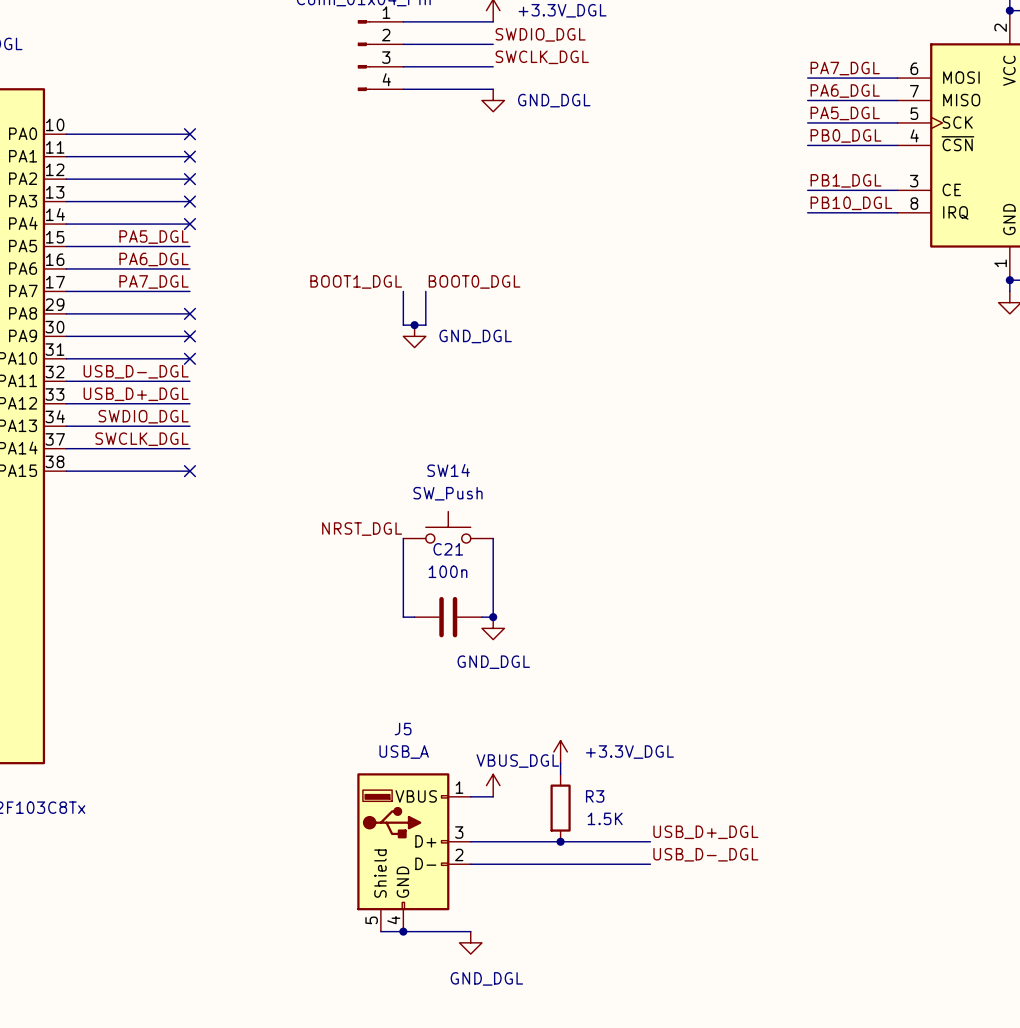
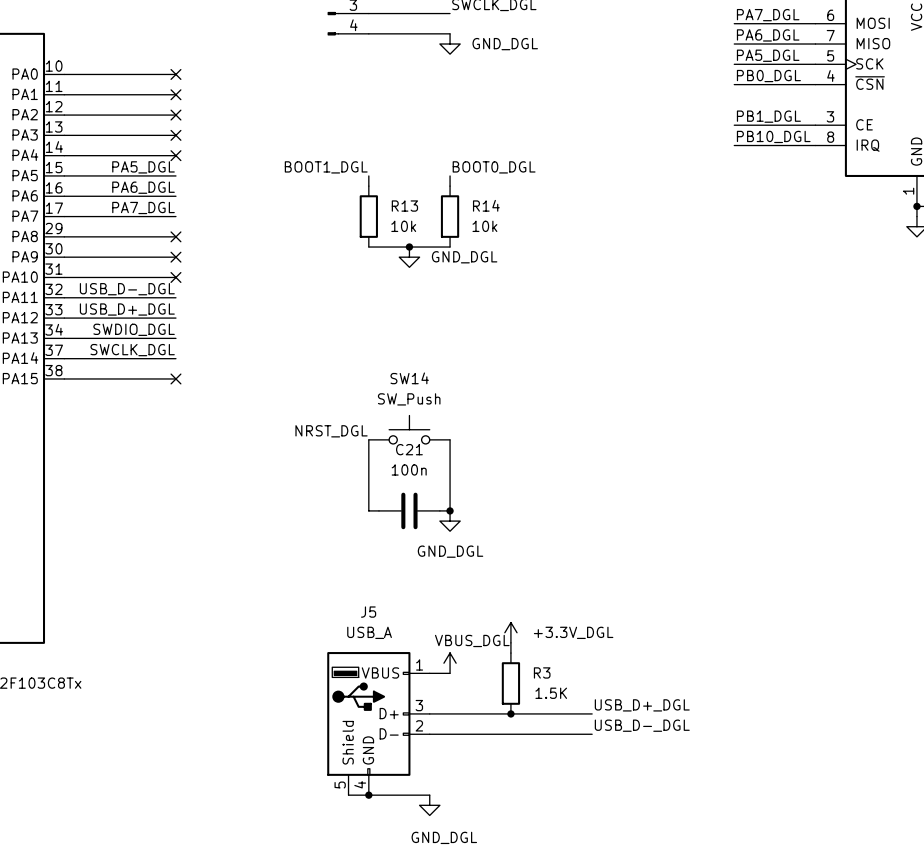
wire: none -> (368, 175) (368, 186)
wire: none -> (450, 175) (450, 186)
label position: BOOT1_DGL (356, 281) -> BOOT1_DGL (326, 167)
label position: BOOT0_DGL (474, 281) -> BOOT0_DGL (494, 167)
wire: (403, 291) (403, 325) -> none
R13: none -> 10k (368, 216)
wire: (425, 291) (425, 325) -> (450, 247) (389, 247)
R14: none -> 10k (450, 216)
junction position: (414, 325) -> (409, 247)
power symbol position: GND_DGL (414, 336) -> GND_DGL (409, 257)

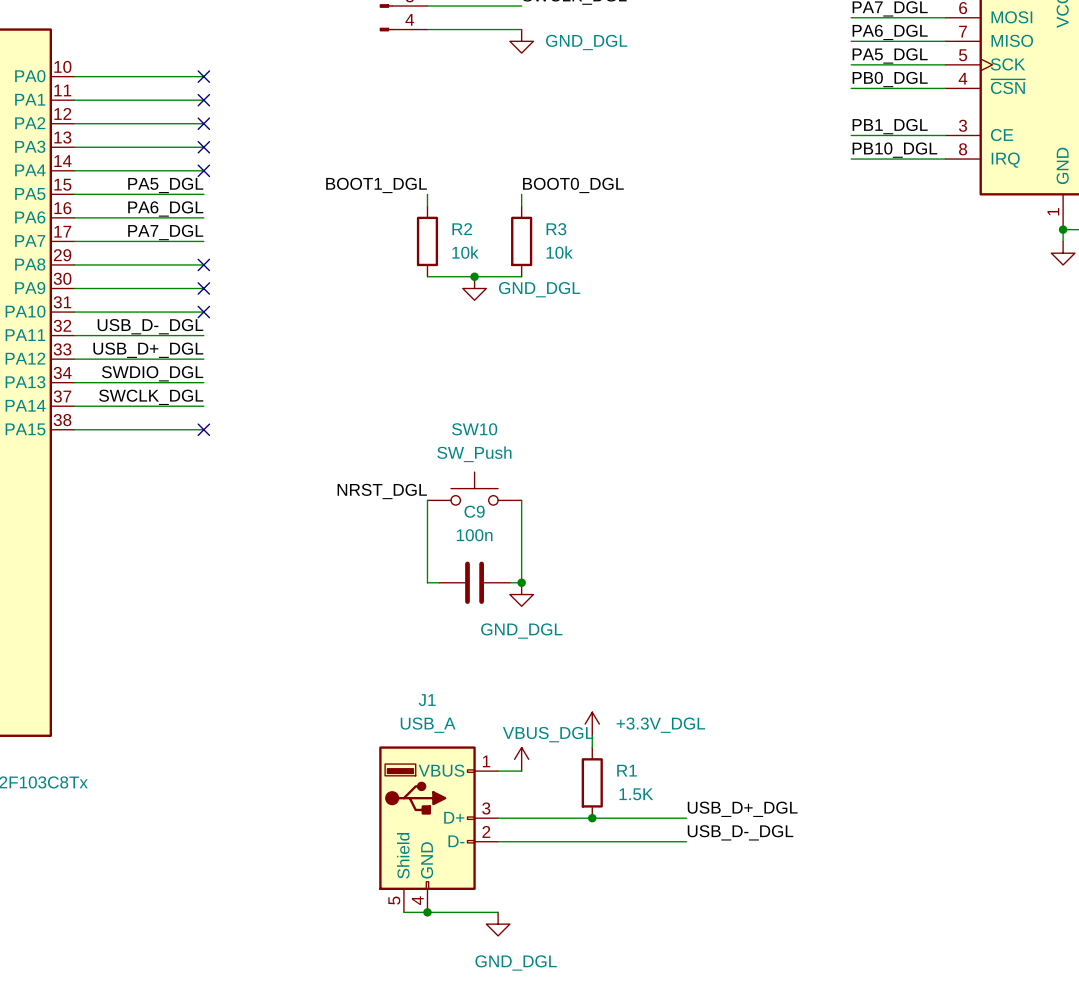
R14 name: R14 (486, 205) -> R3 (556, 229)
R13 name: R13 (404, 206) -> R2 (462, 229)
SW14 name: SW14 (409, 378) -> SW10 (474, 429)
C21 name: C21 (409, 449) -> C9 (474, 511)
J5 name: J5 (368, 612) -> J1 (427, 700)
R3 name: R3 (542, 672) -> R1 (627, 770)

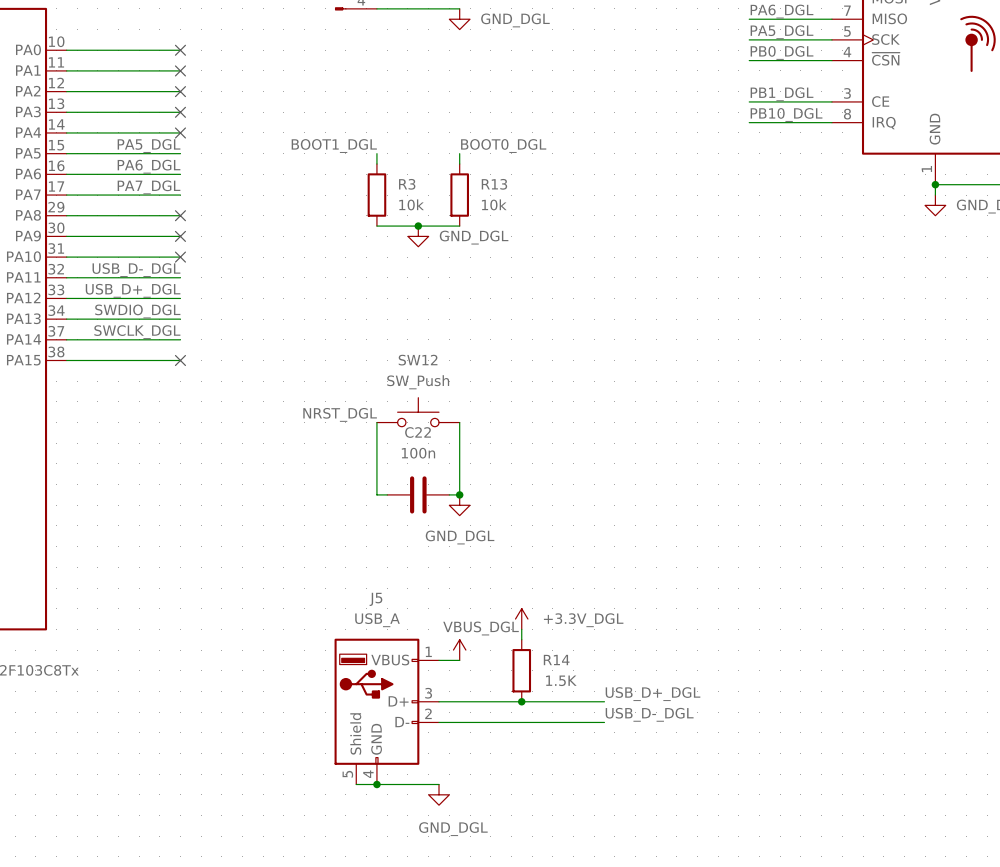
R2 name: R2 (462, 229) -> R3 (407, 184)
R3 name: R3 (556, 229) -> R13 (494, 184)
SW10 name: SW10 (474, 429) -> SW12 (418, 360)
C9 name: C9 (474, 511) -> C22 (418, 432)
J1 name: J1 (427, 700) -> J5 (375, 599)
R1 name: R1 (627, 770) -> R14 (556, 660)

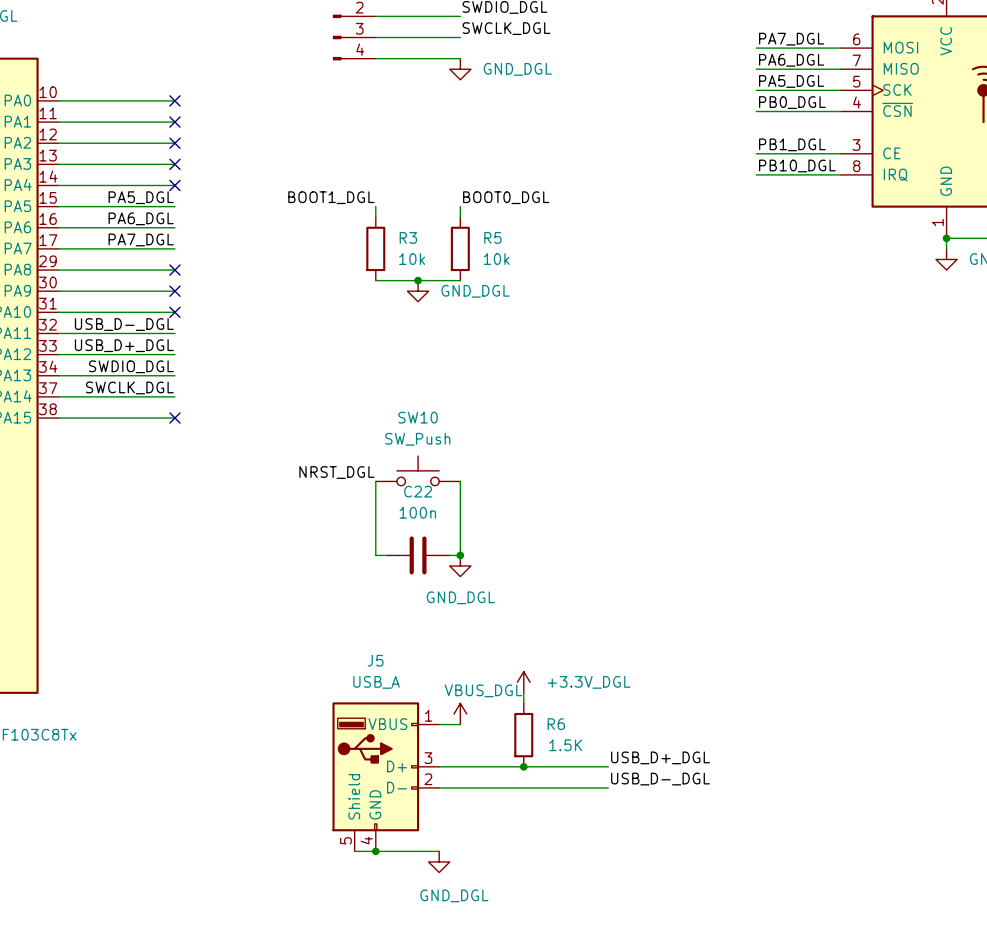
R13 name: R13 (494, 184) -> R5 (492, 237)
SW12 name: SW12 (418, 360) -> SW10 (418, 417)
R14 name: R14 (556, 660) -> R6 (556, 724)

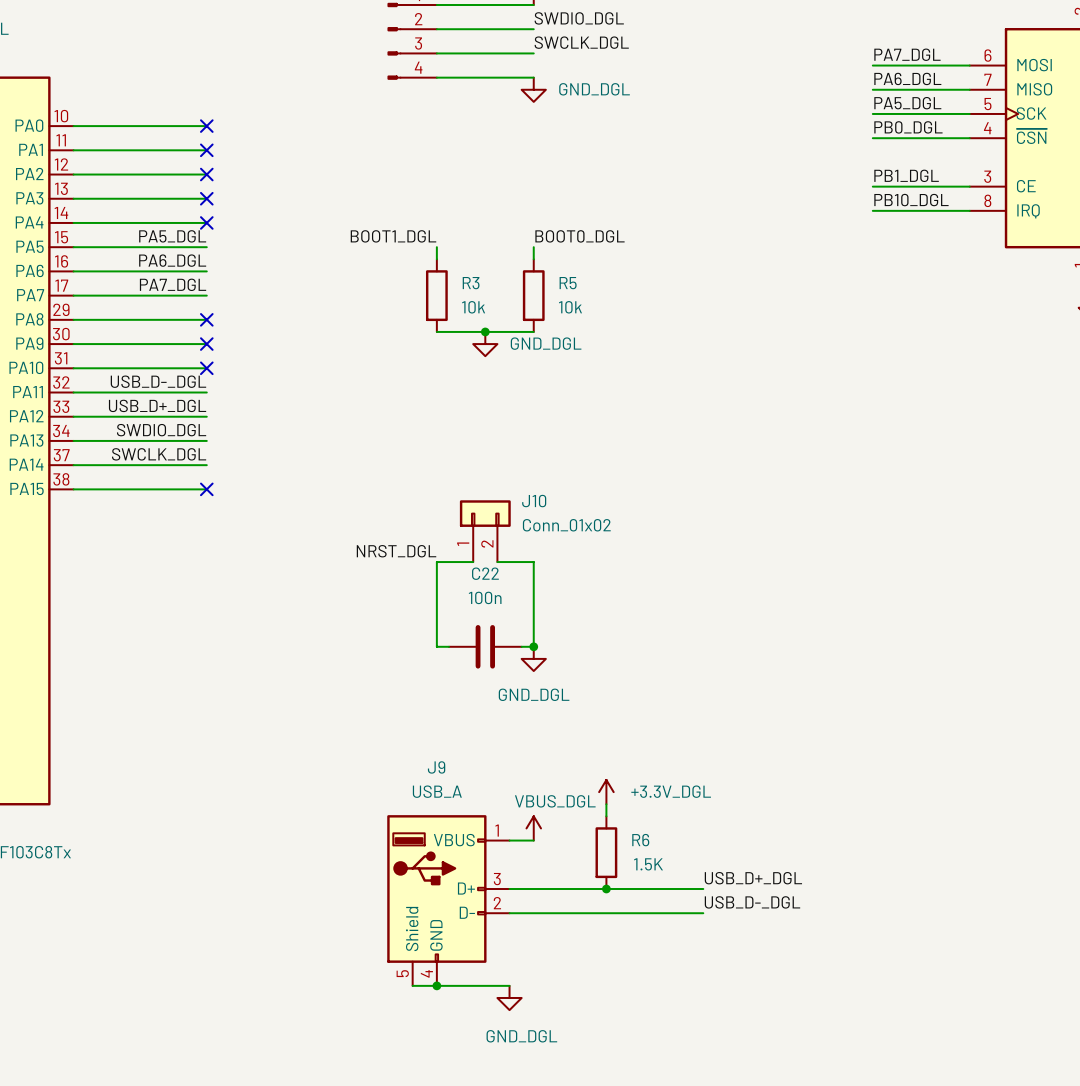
J10: none -> Conn_01x02 (485, 531)
SW10: SW_Push (418, 470) -> none
J5 name: J5 (375, 660) -> J9 (436, 767)

